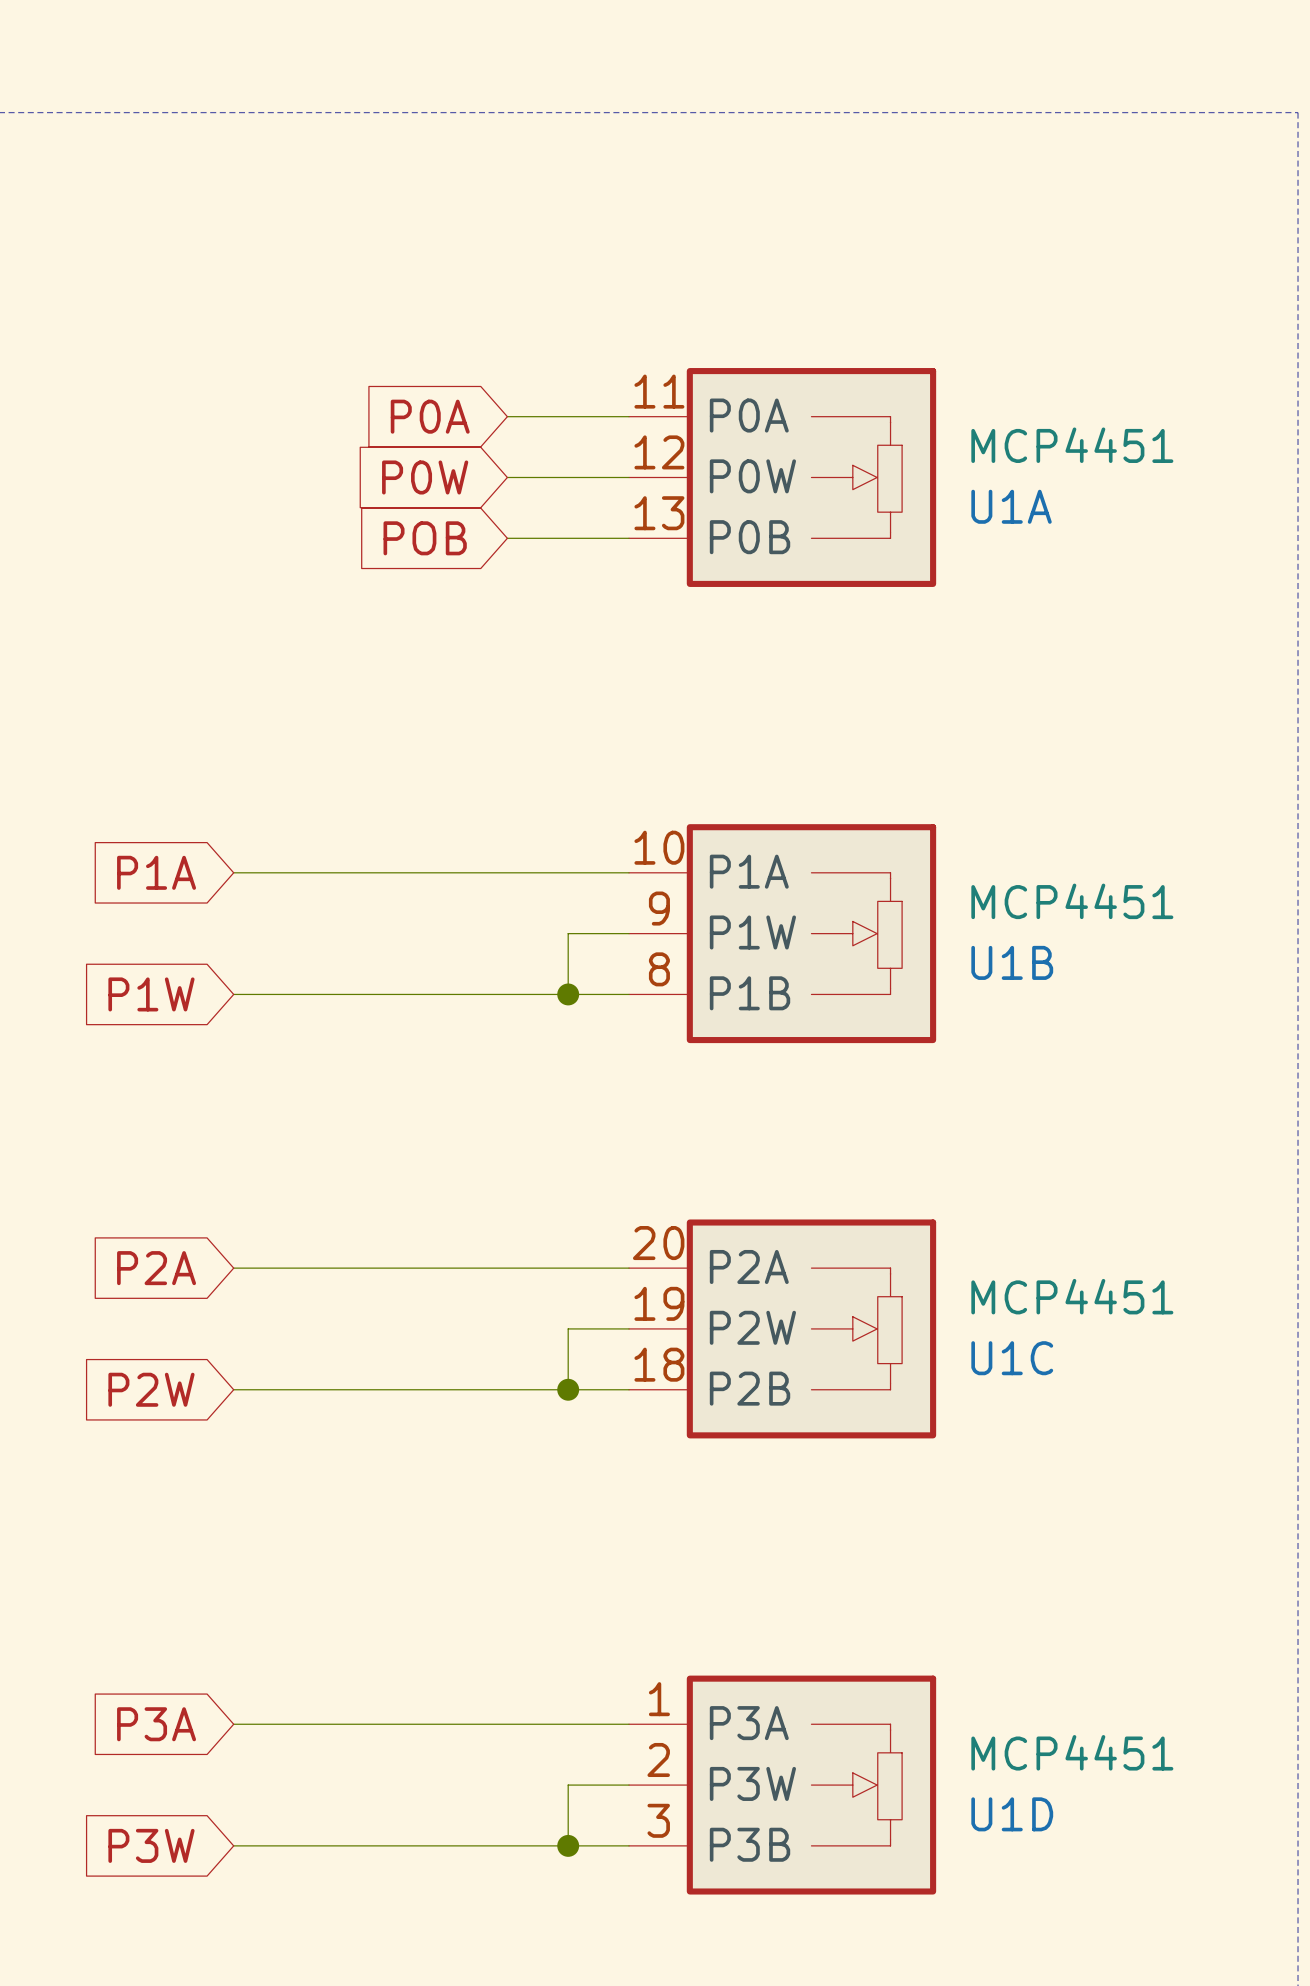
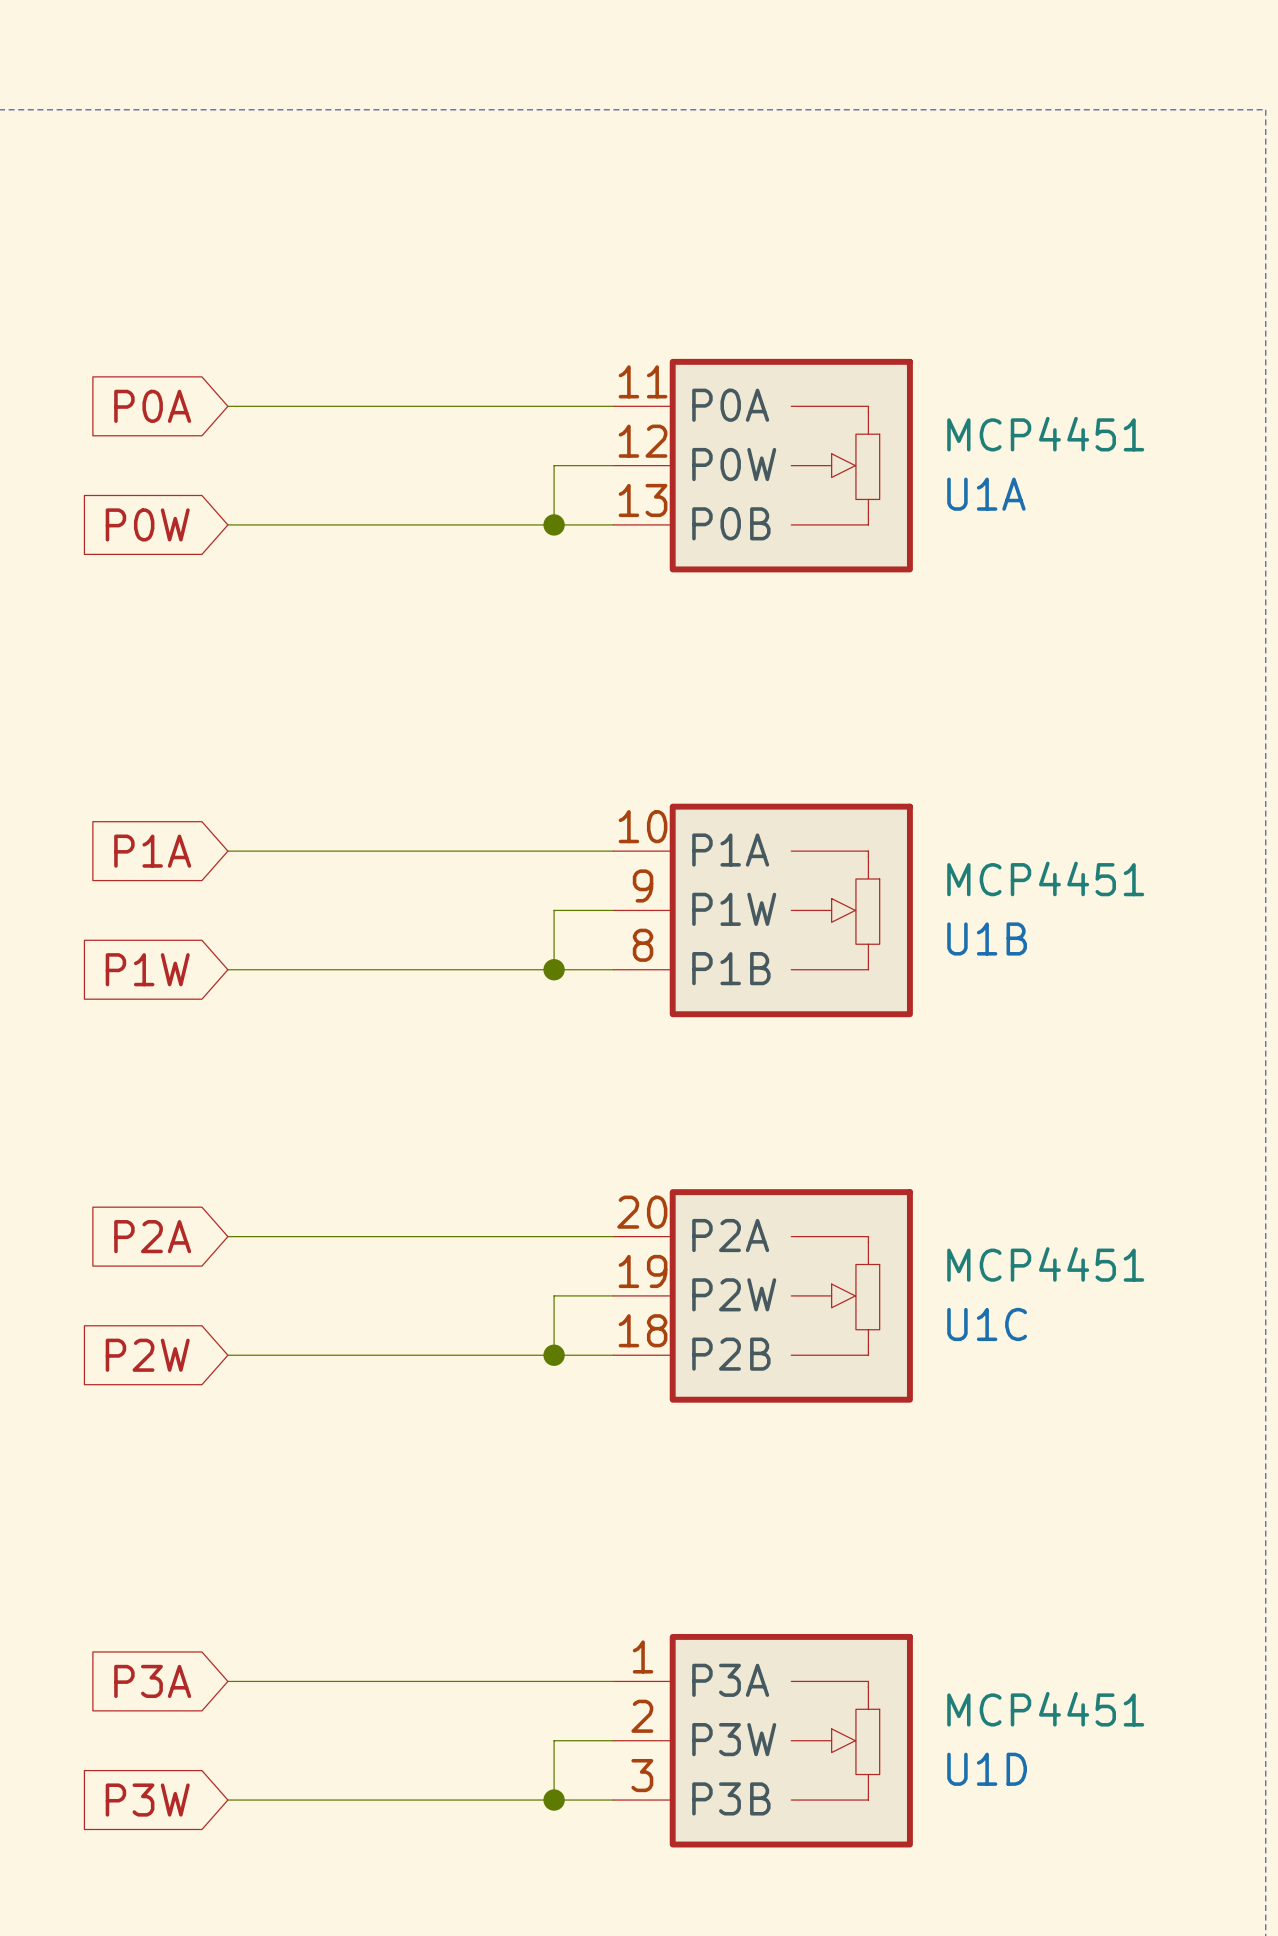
wire: none -> (227, 406) (494, 406)
global label position: P0A (430, 416) -> P0A (152, 406)
global label position: P0W (425, 477) -> P0W (147, 524)
wire: (507, 477) (568, 477) -> (554, 524) (554, 465)
wire: none -> (227, 524) (494, 524)
global label: POB (425, 538) -> none
junction: none -> (554, 524)

